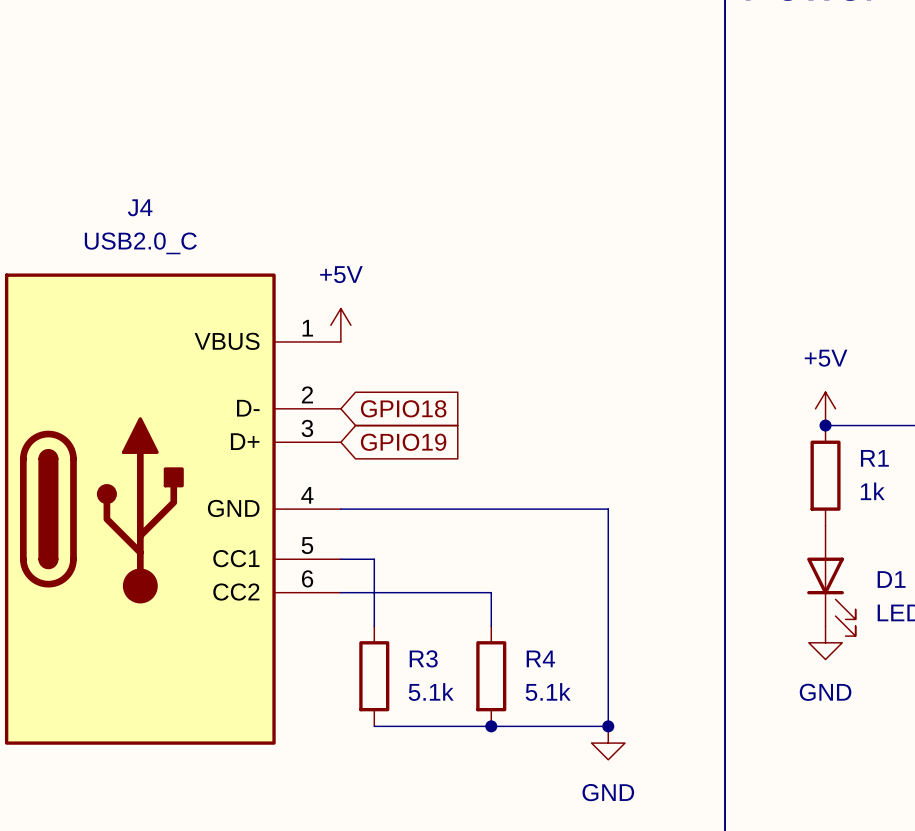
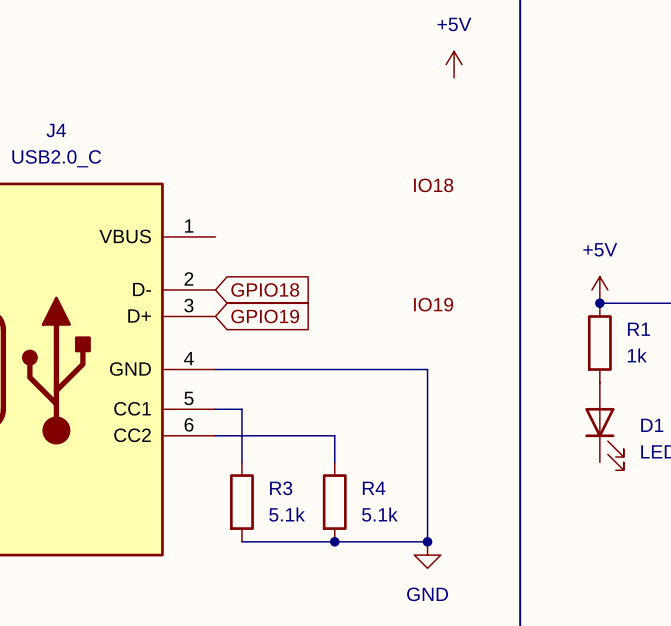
power symbol: none -> +5V (454, 64)
label: none -> IO18 (433, 185)
power symbol: +5V (340, 325) -> none
label: none -> IO19 (433, 304)
power symbol: GND (825, 642) -> none

